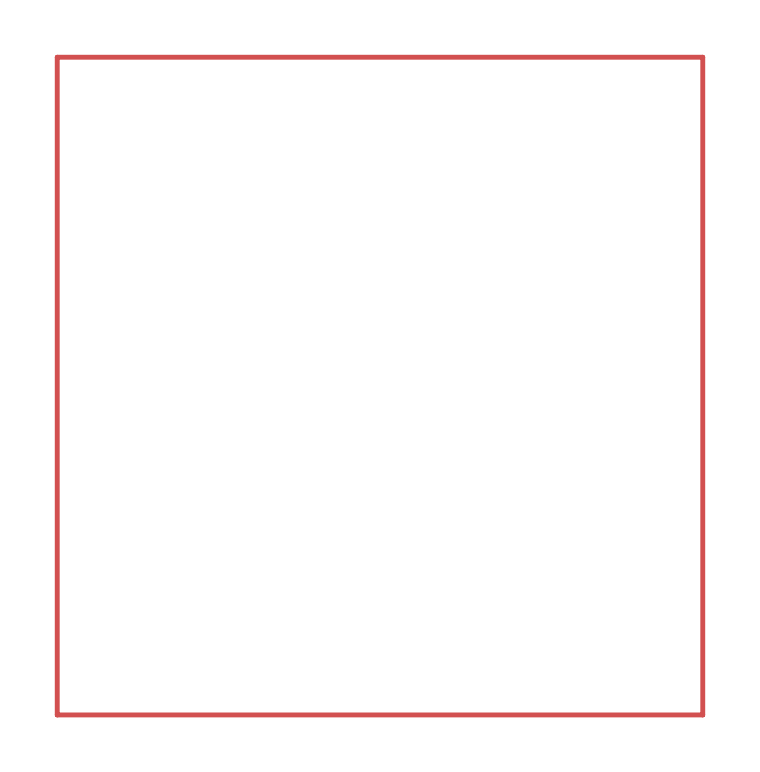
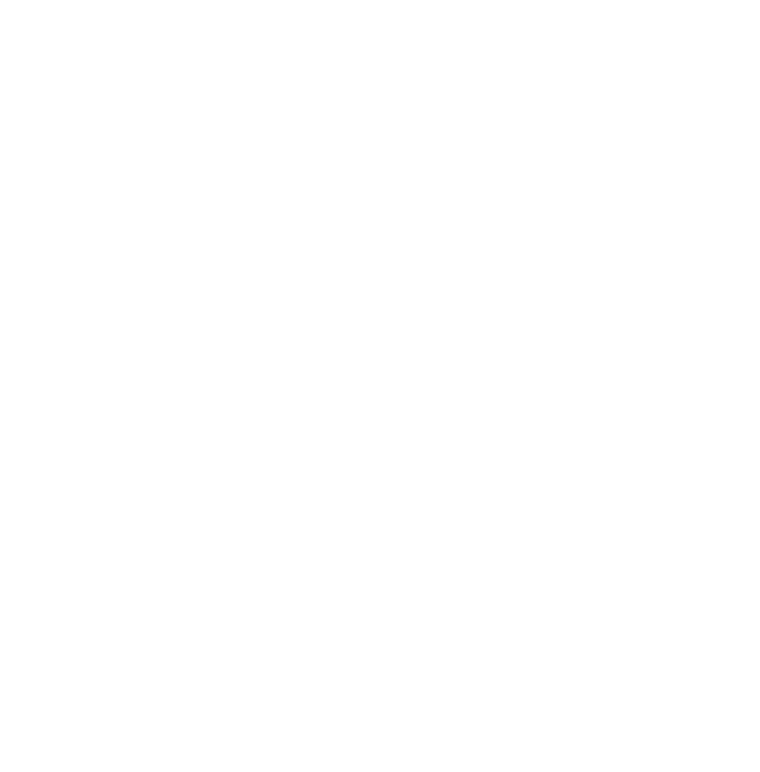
track: (57, 57) (702, 57) (702, 714) (57, 714) (57, 57) -> none

